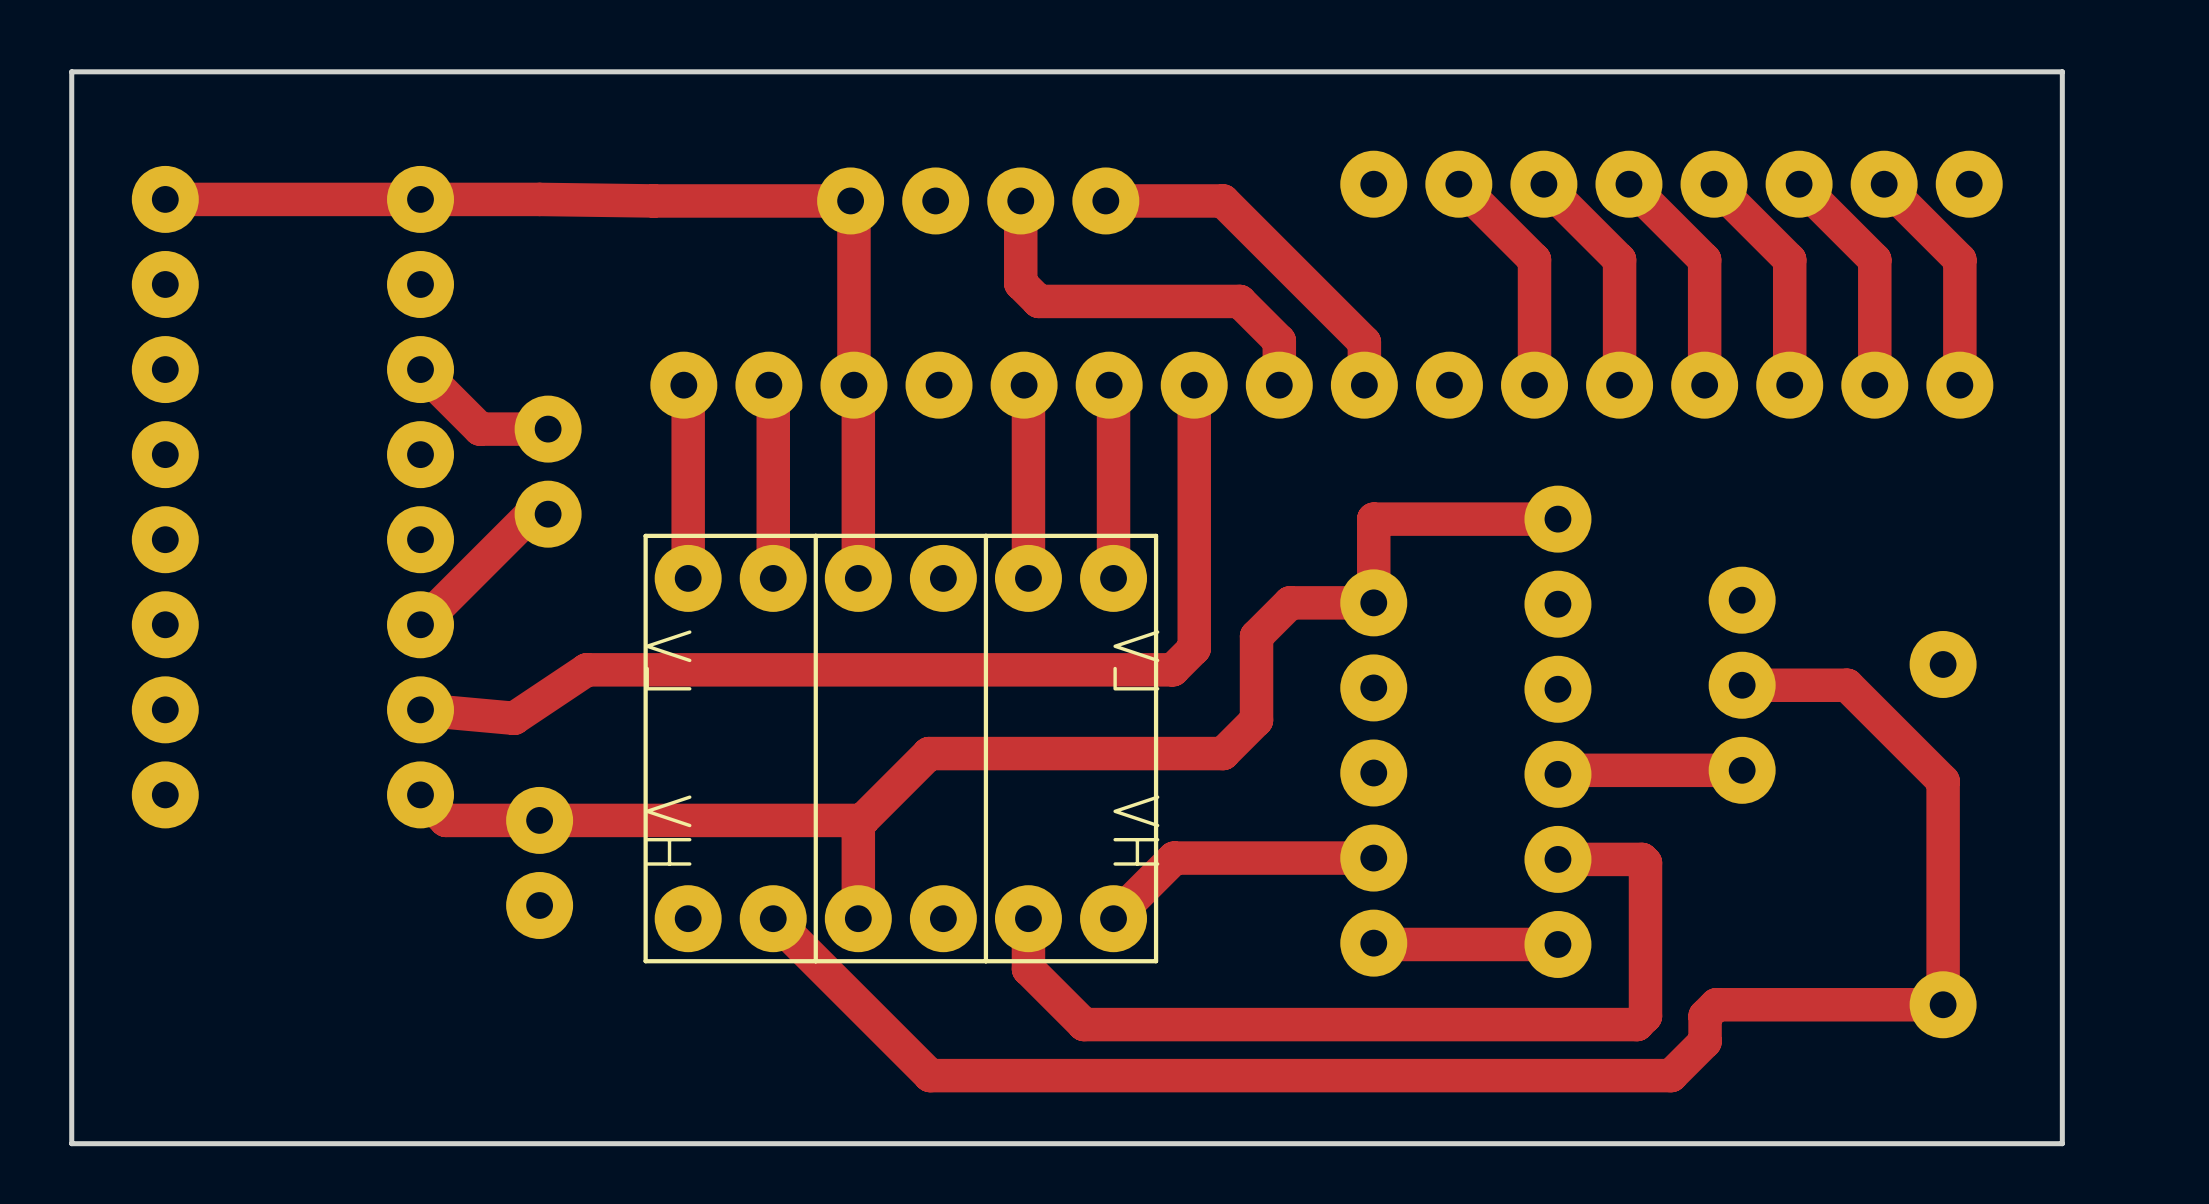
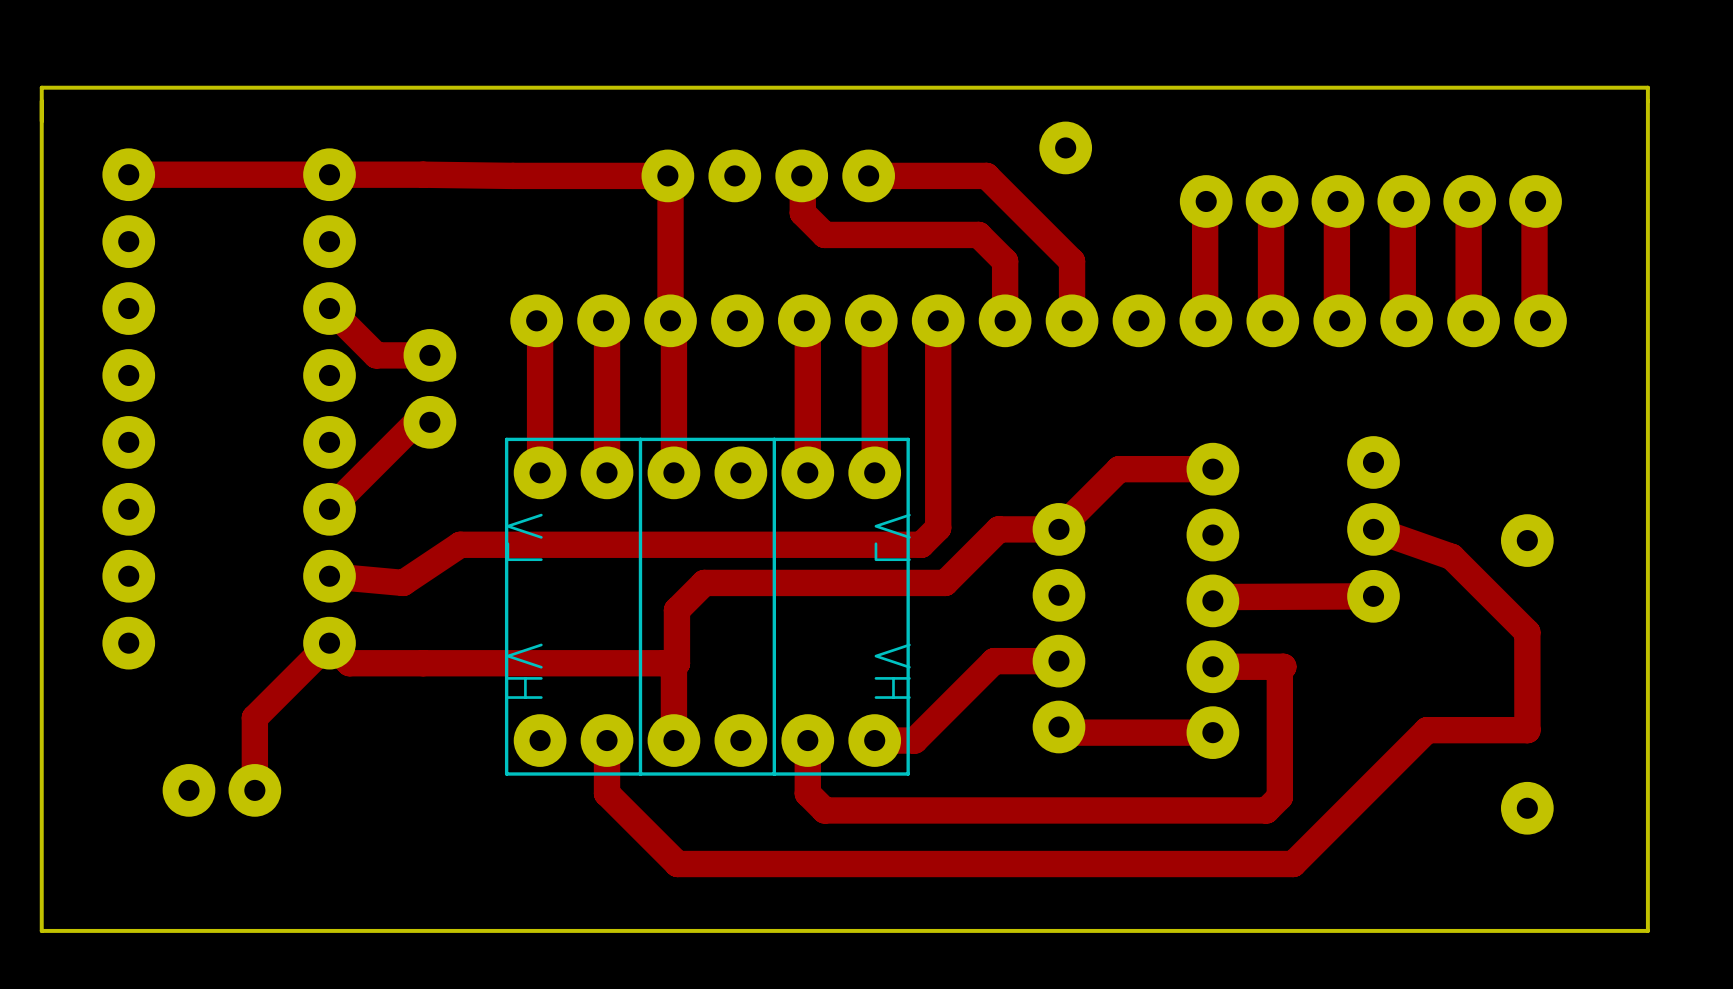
board edge: (2062, 71) (2062, 1143) (71, 1143) (71, 71) (2062, 71) -> (1647, 87) (1647, 930) (41, 930) (41, 87) (1647, 87)
part: none -> (1065, 147)
top track: (1458, 184) (1534, 259) (1534, 385) -> (1205, 201) (1205, 320)
top track: (1543, 184) (1619, 259) (1619, 385) -> (1271, 201) (1271, 319) (1272, 320)
top track: (1628, 184) (1704, 259) (1704, 385) -> (1336, 201) (1336, 317) (1339, 320)
part: (1671, 184) -> none
top track: (1714, 184) (1789, 259) (1789, 385) -> (1402, 201) (1402, 316) (1406, 320)
top track: (1799, 184) (1874, 259) (1874, 385) -> (1468, 201) (1468, 315) (1473, 320)
top track: (1884, 184) (1959, 259) (1959, 385) -> (1534, 201) (1534, 314) (1540, 320)
top track: (1020, 200) (1020, 283) (1038, 301) (1239, 301) (1279, 340) -> (802, 175) (802, 212) (824, 234) (978, 234) (1005, 261) (1005, 286)
top track: (1223, 200) (1364, 342) -> (960, 175) (986, 175) (1072, 261) (1072, 287)
part: none -> (1370, 201)
part footprint: [1524, 485, 1592, 978] -> [1186, 442, 1240, 759]
top track: (1557, 519) (1373, 519) (1373, 602) (1290, 602) (1256, 636) (1256, 720) (1223, 753) (928, 753) (862, 820) -> (1212, 469) (1119, 469) (1058, 529) (998, 529) (945, 582) (704, 582) (676, 610) (676, 663)
part footprint: [1340, 569, 1408, 977] -> [1032, 503, 1086, 754]
part position: (1742, 685) -> (1373, 529)
top track: (1847, 685) (1742, 685) -> (1451, 556) (1373, 529)
top track: none -> (1373, 596) (1220, 597) (1217, 600)
top track: (1742, 770) (1561, 770) (1557, 774) -> none
top track: (1943, 781) (1943, 1004) (1716, 1004) -> (1527, 632) (1527, 730) (1427, 730) (1348, 808)
top track: none -> (329, 643) (254, 717) (254, 790)
top track: (1373, 858) (1174, 858) (1113, 918) -> (1058, 661) (994, 661) (914, 740) (874, 740)
top track: (1557, 859) (1641, 859) (1645, 862) (1645, 1016) (1637, 1024) (1084, 1024) (1028, 968) -> (1212, 666) (1283, 666) (1279, 670) (1279, 797) (1266, 810) (824, 810) (807, 793) (807, 780)
part: (539, 862) -> none
top track: none -> (1058, 727) (1064, 732) (1212, 732)
top track: (773, 918) (930, 1075) -> (607, 740) (607, 793) (677, 864) (730, 864)
top track: (1373, 943) (1557, 944) -> none
part: none -> (221, 790)
top track: (1705, 1016) (1705, 1041) (1671, 1075) (1645, 1075) -> (1340, 817) (1293, 864)

